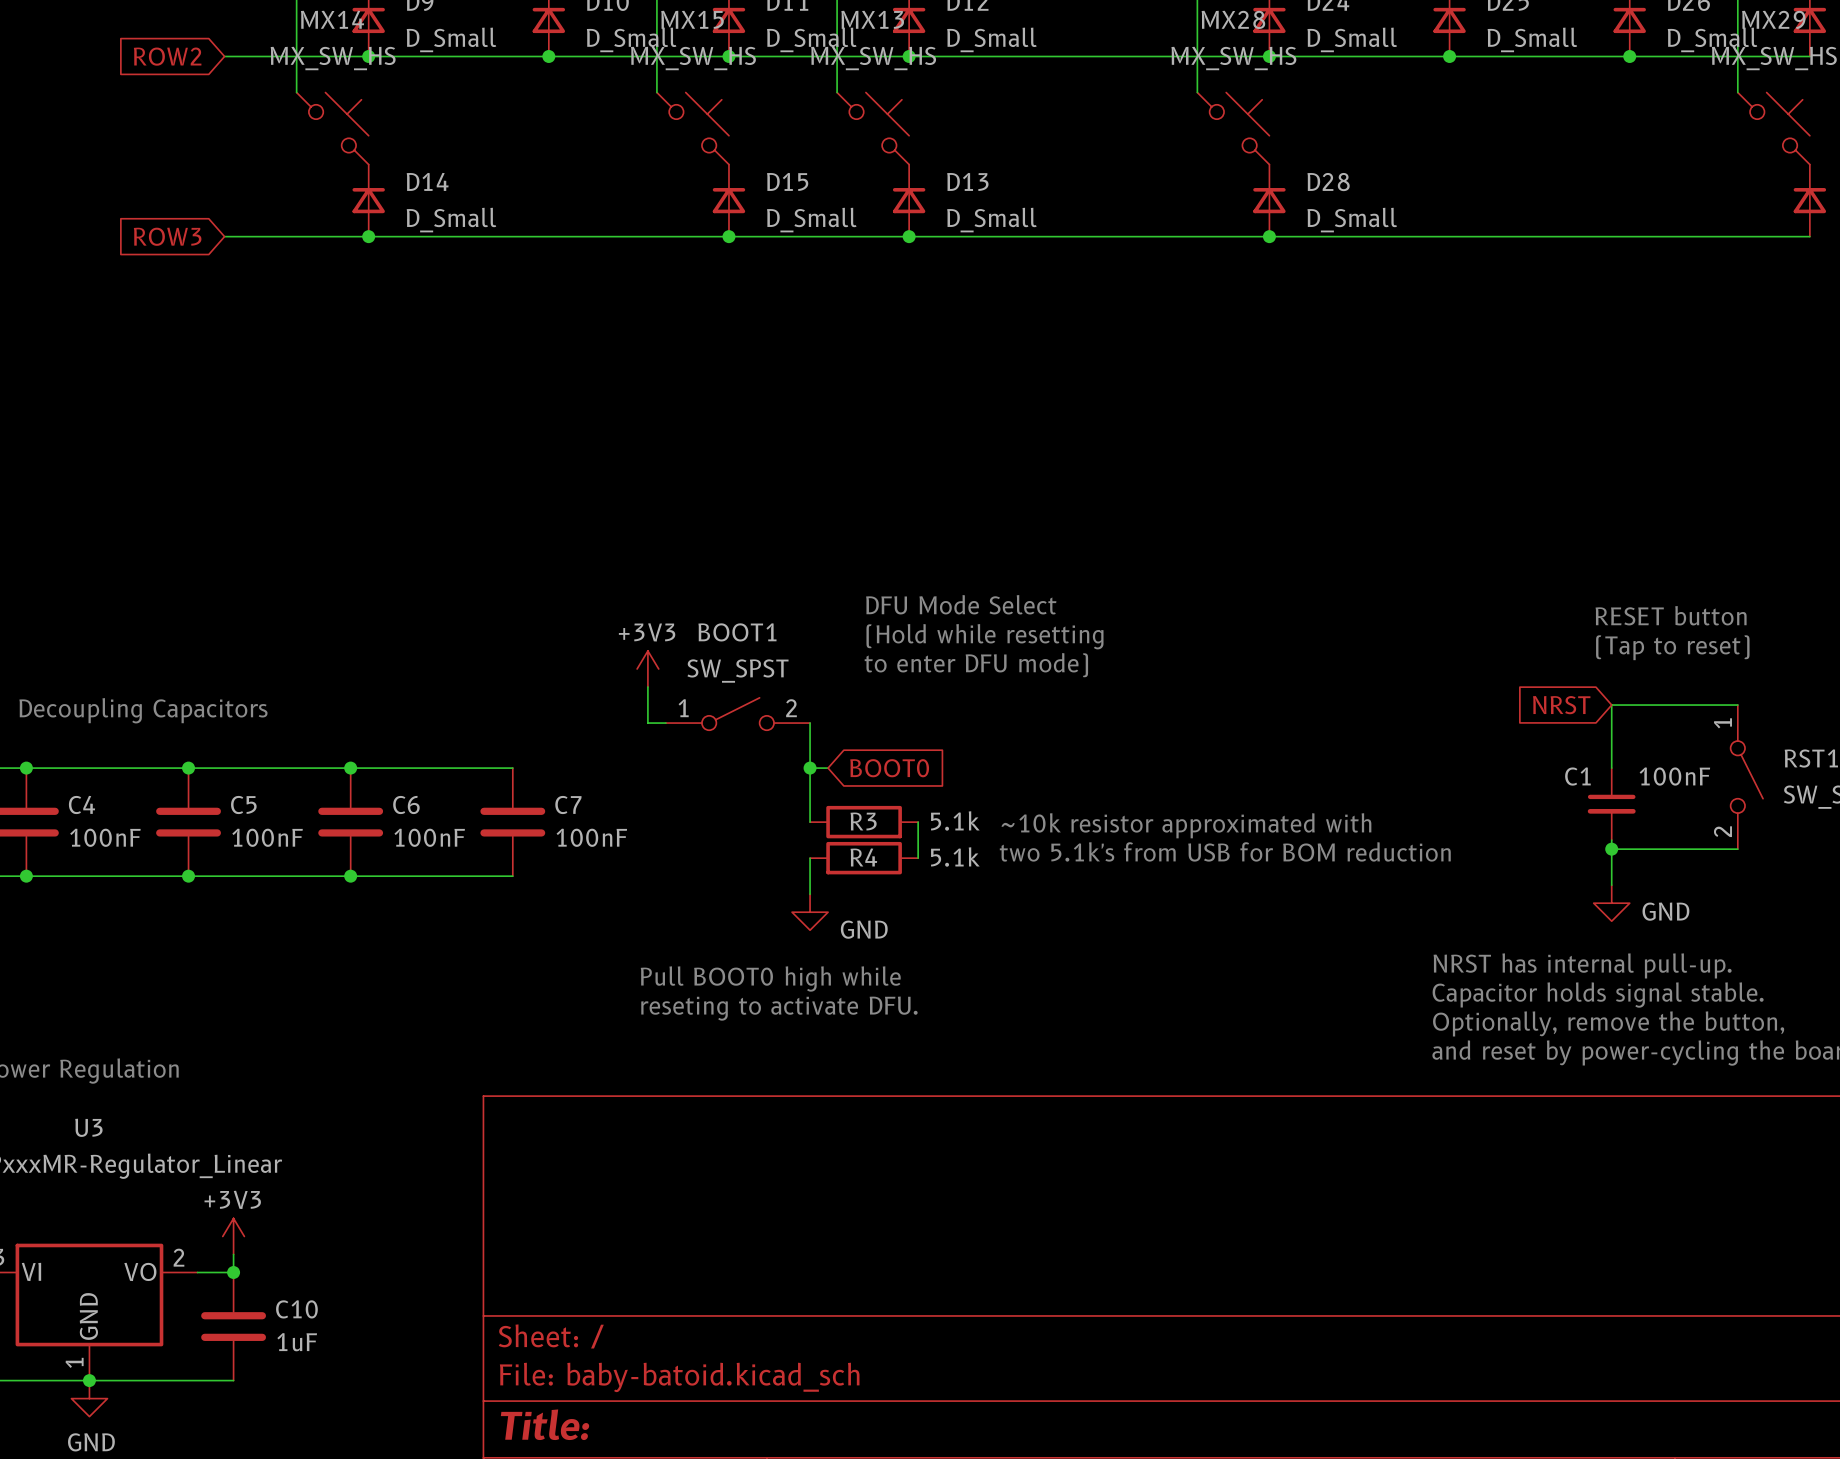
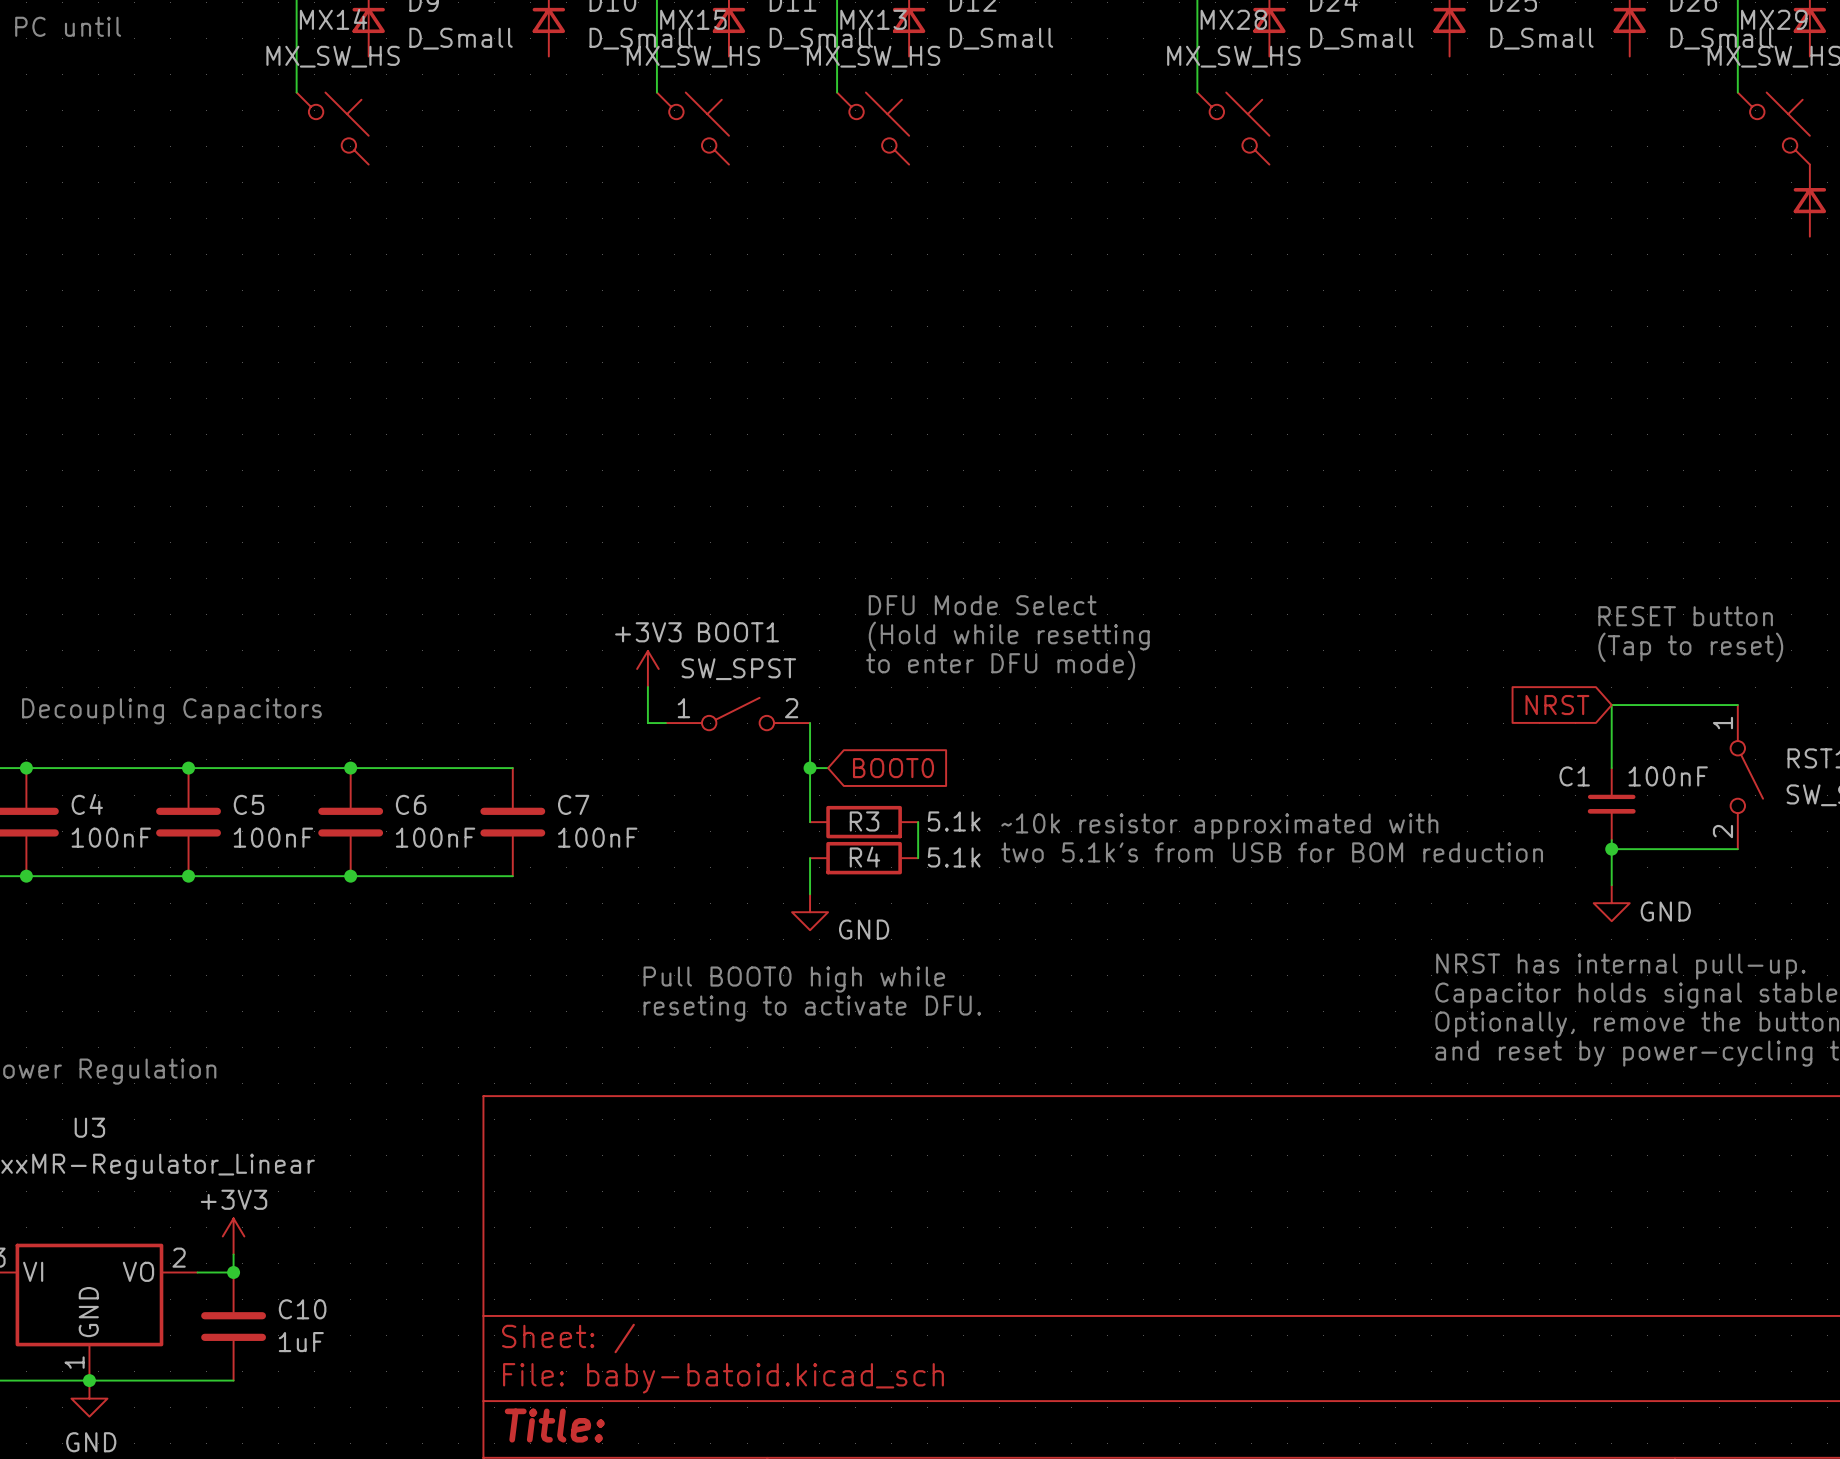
global label: ROW2 (167, 56) -> none
wire: (224, 56) (1809, 56) -> none
junction: (368, 56) -> none
junction: (548, 56) -> none
junction: (728, 56) -> none
junction: (909, 56) -> none
junction: (1269, 56) -> none
junction: (1449, 56) -> none
junction: (1629, 56) -> none
D14: D_Small (368, 200) -> none
D15: D_Small (728, 200) -> none
D13: D_Small (909, 200) -> none
D28: D_Small (1269, 200) -> none
global label: ROW3 (167, 236) -> none
wire: (224, 236) (1809, 236) -> none
junction: (368, 236) -> none
junction: (728, 236) -> none
junction: (909, 236) -> none
junction: (1269, 236) -> none

